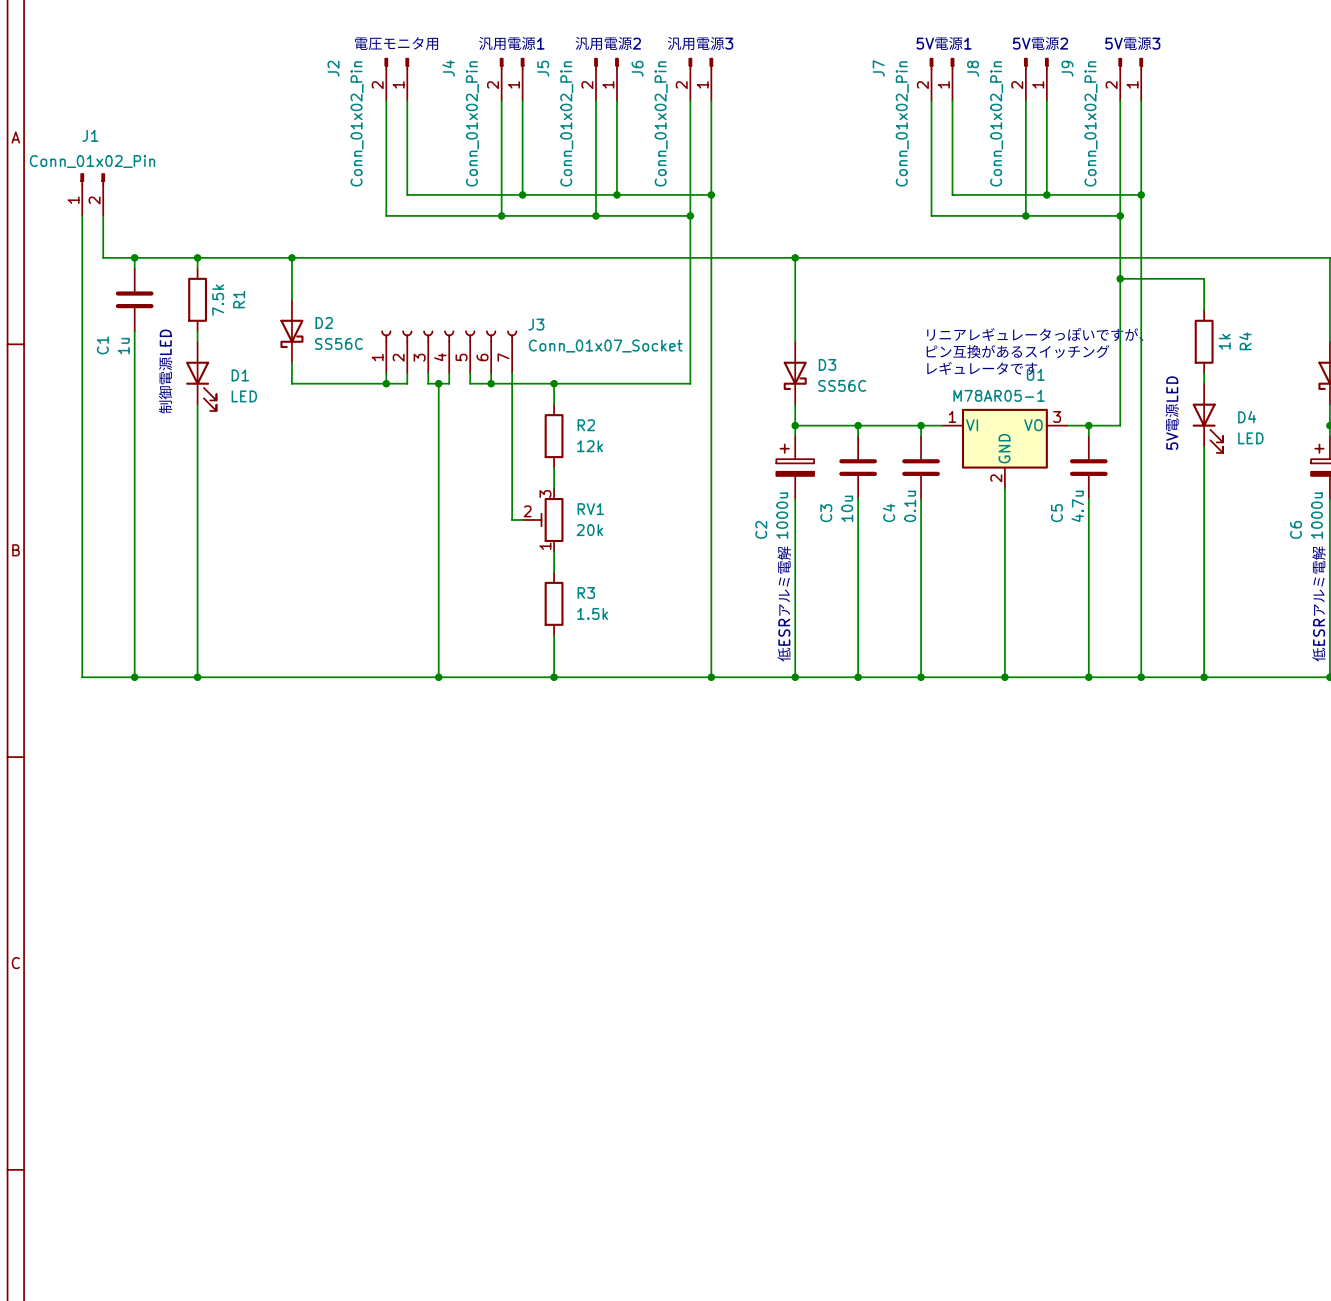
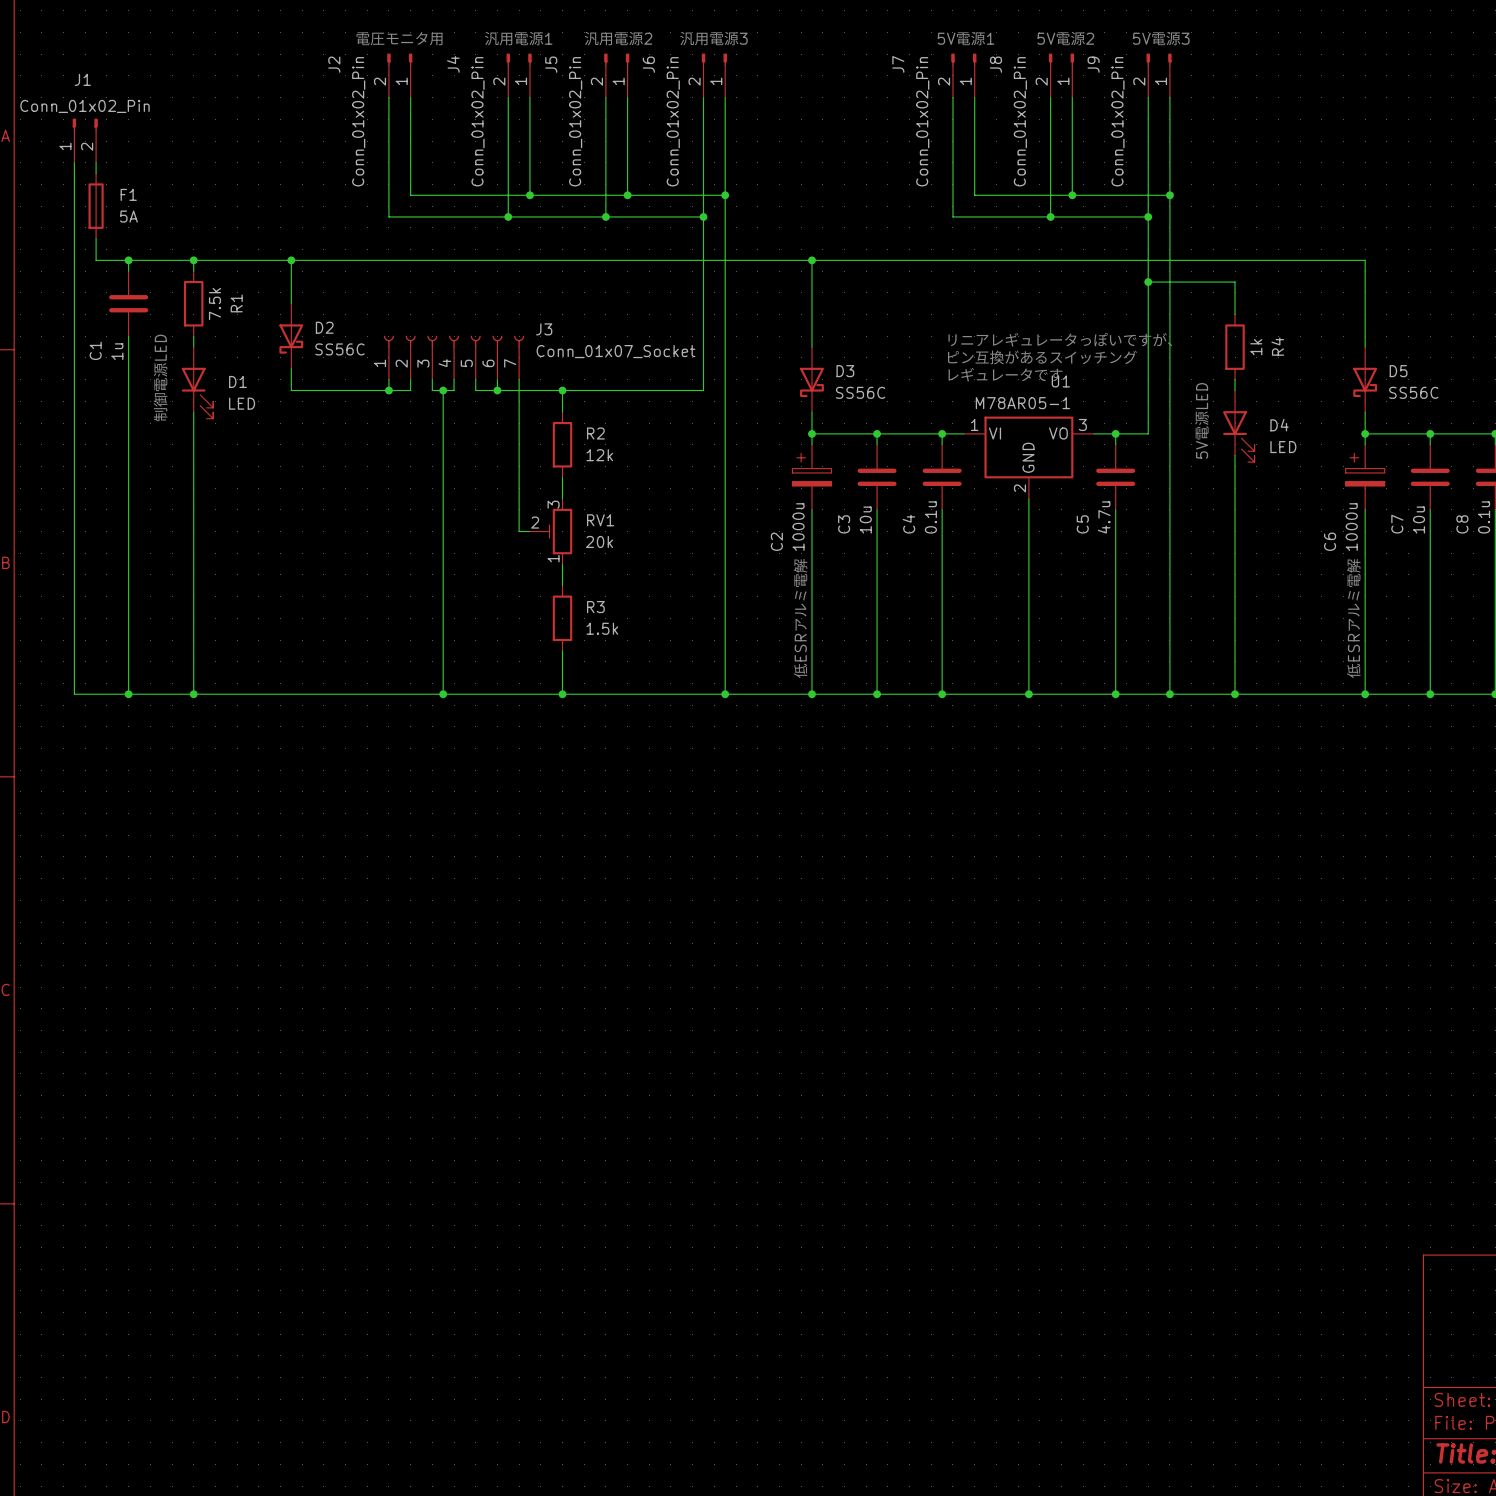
wire: none -> (96, 162) (96, 173)
J1 position: (92, 194) -> (85, 140)
F1: none -> 5A (96, 206)

